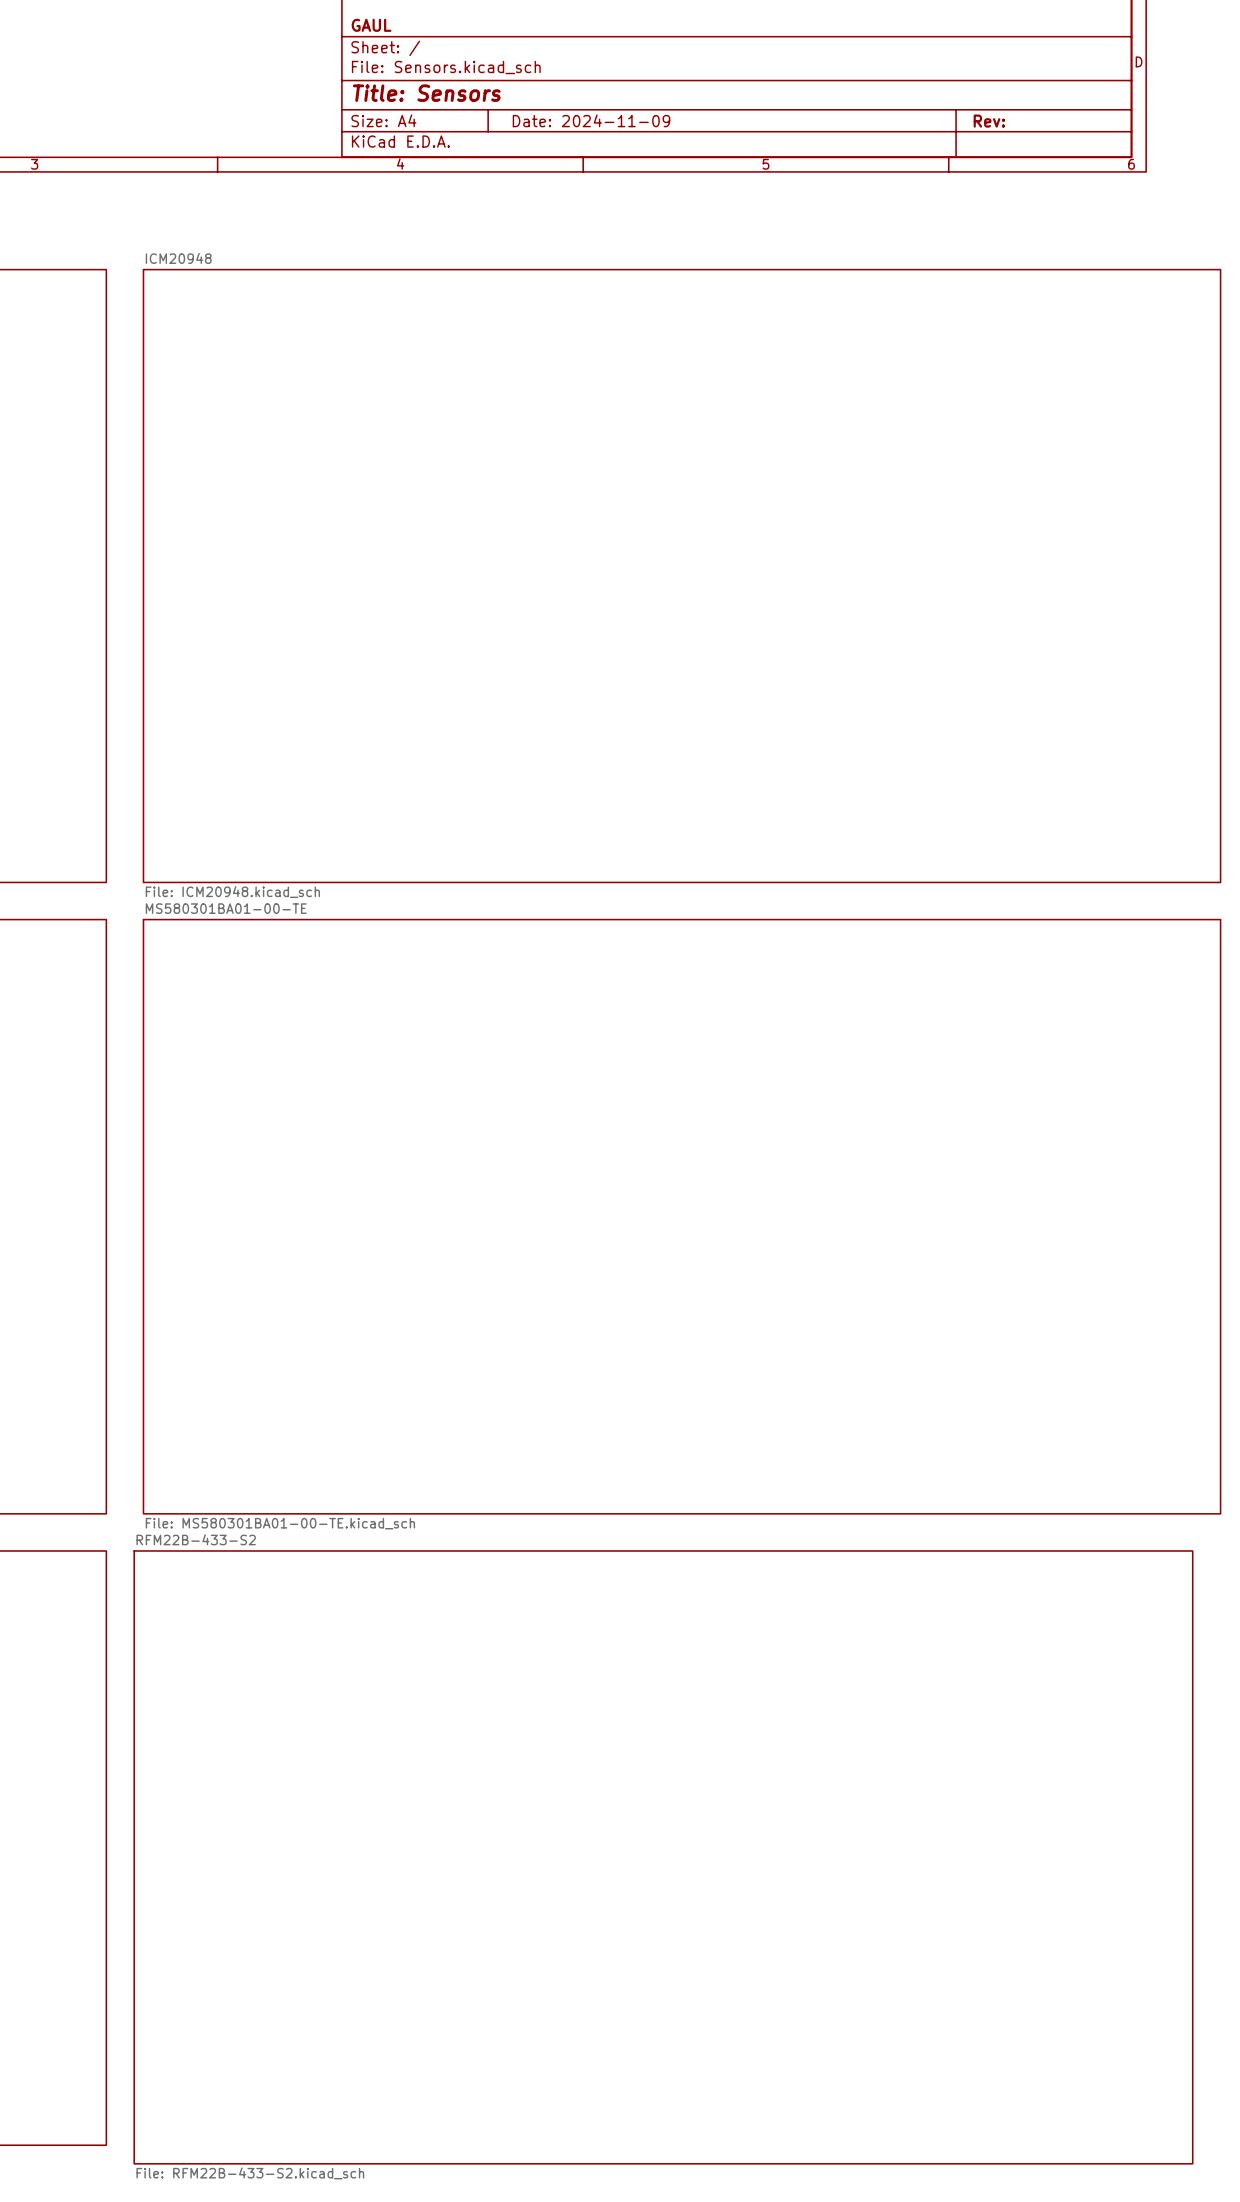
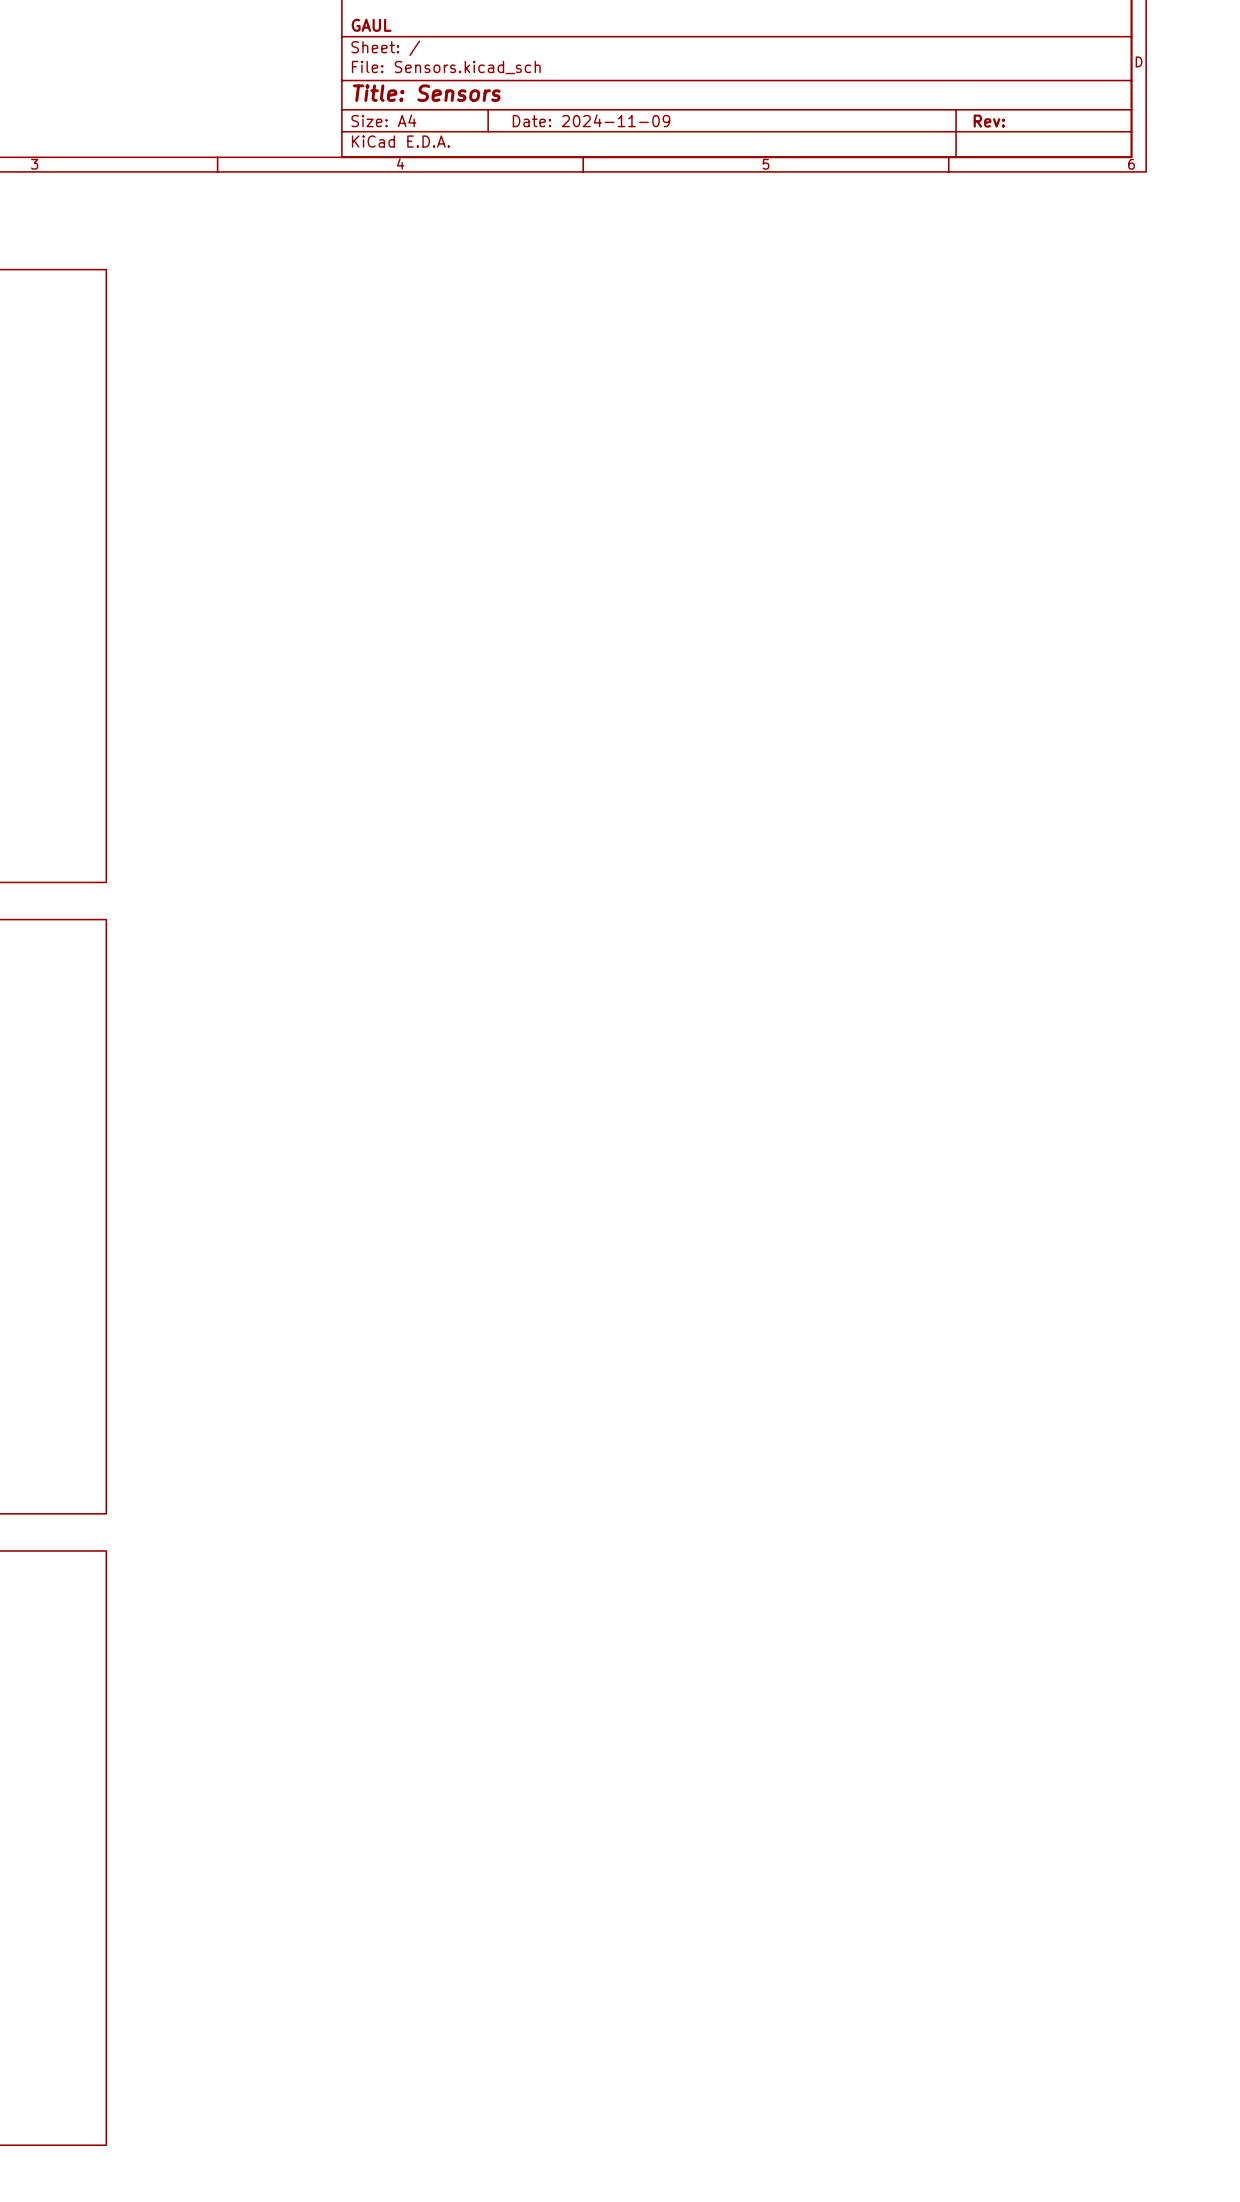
sheet ICM20948: File: ICM20948.kicad_sch (682, 576) -> none
sheet MS580301BA01-00-TE: File: MS580301BA01-00-TE.kicad_sch (682, 1216) -> none
sheet RFM22B-433-S2: File: RFM22B-433-S2.kicad_sch (663, 1857) -> none

